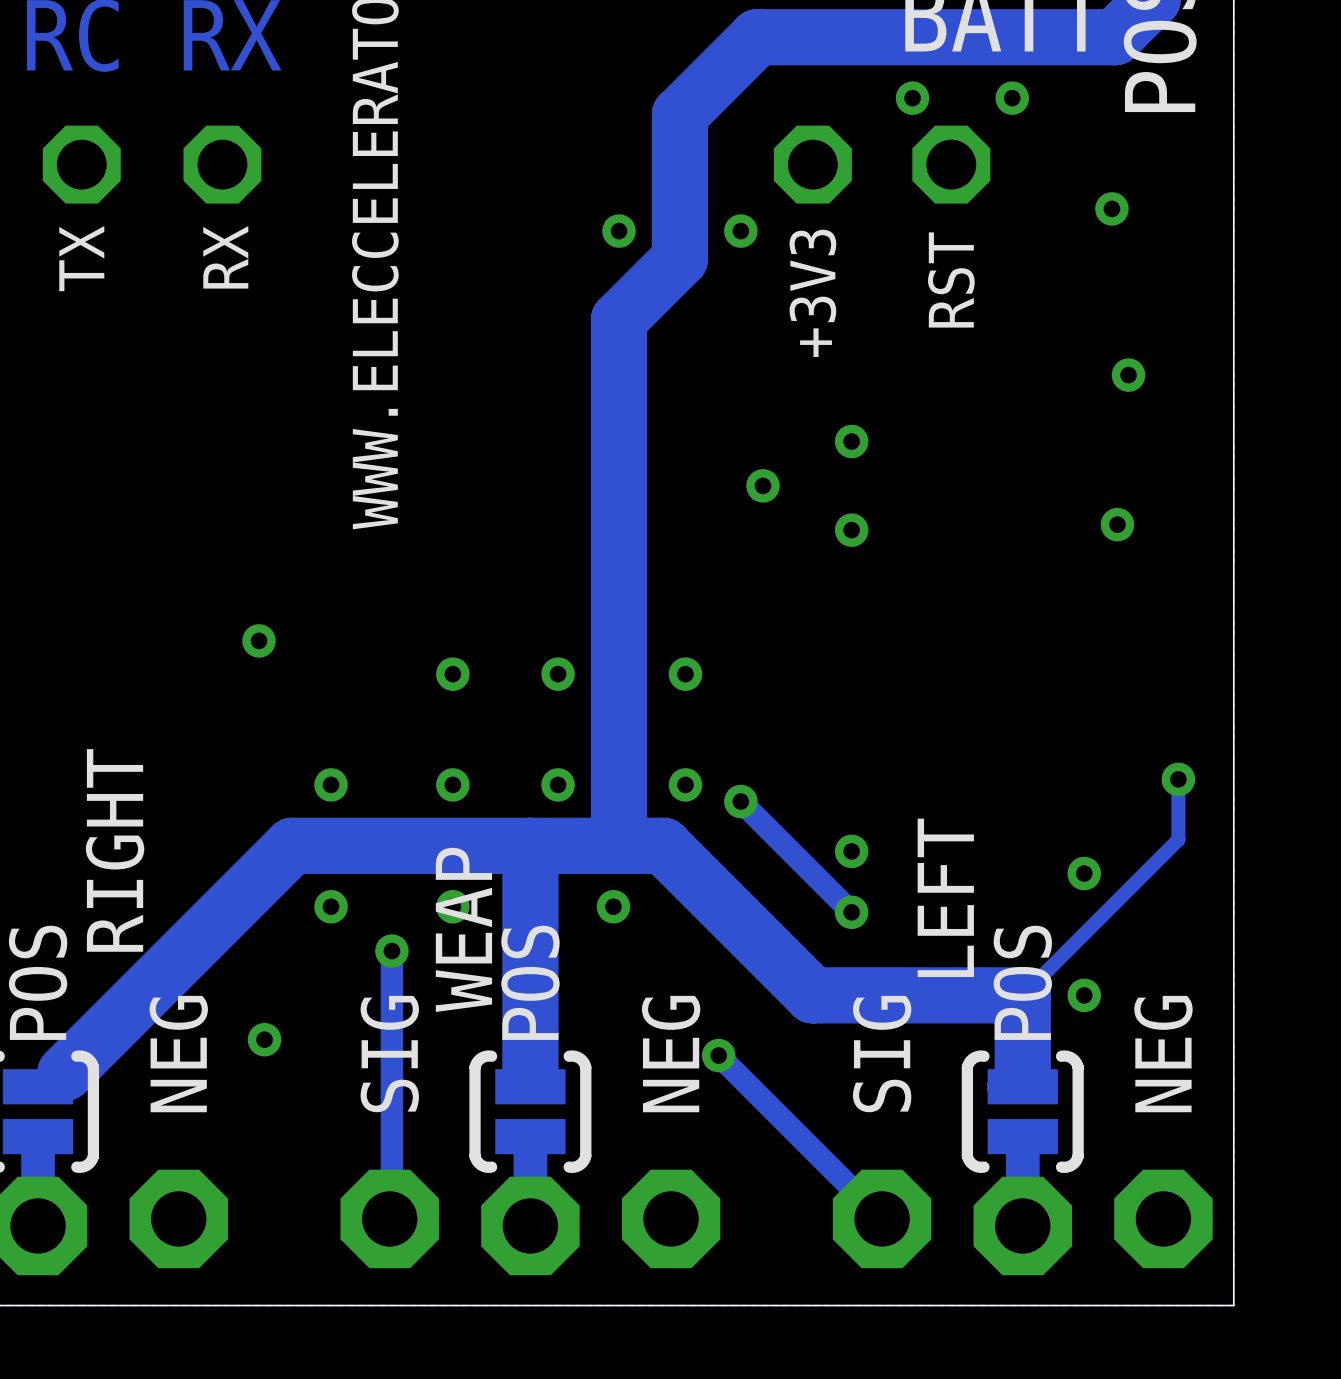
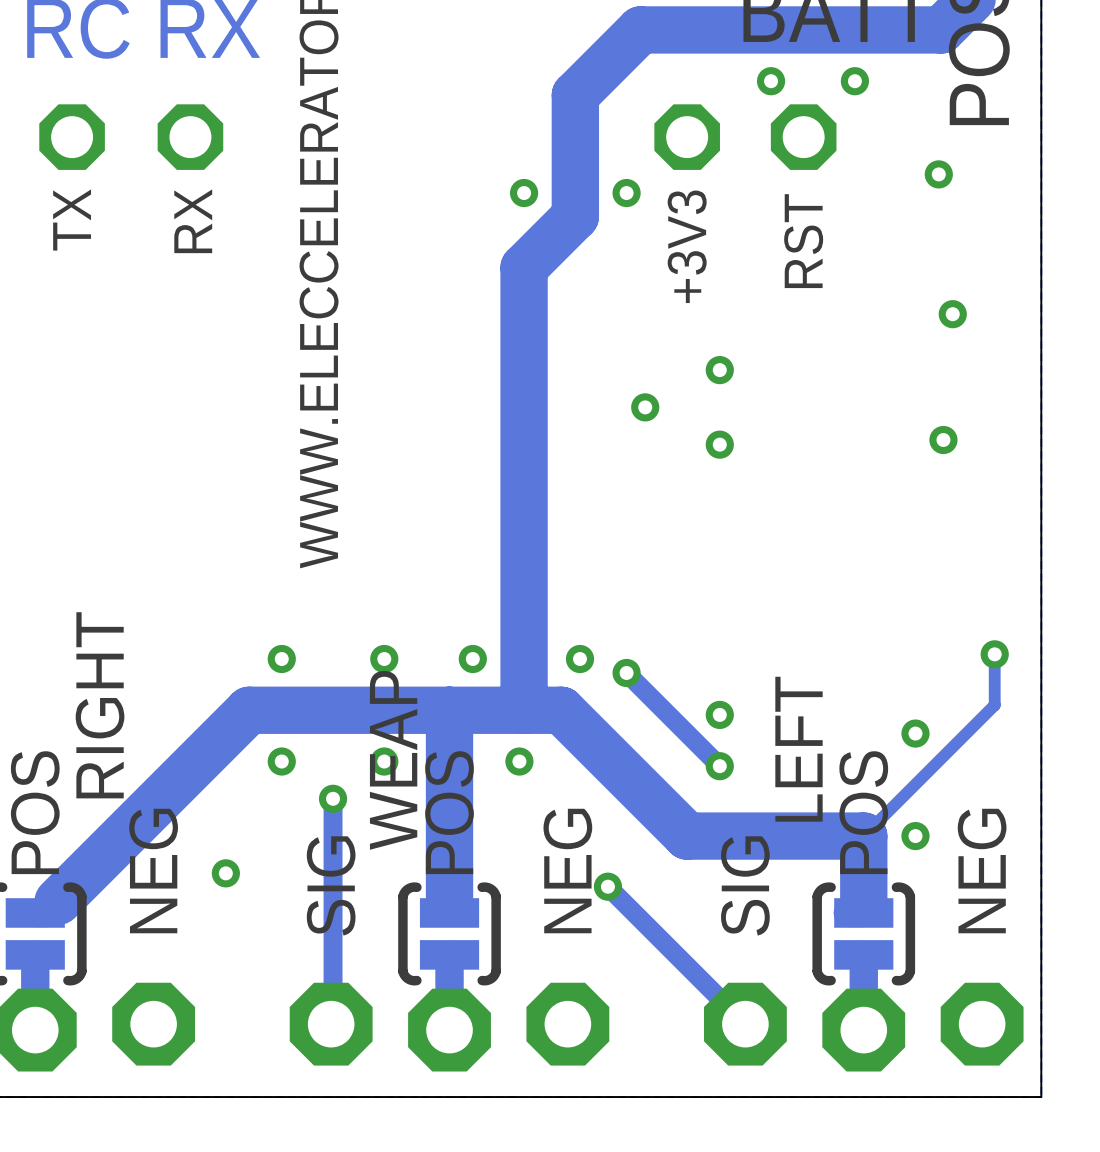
via: (259, 640) -> none
via: (452, 674) -> none
via: (558, 674) -> none
via: (685, 674) -> none

